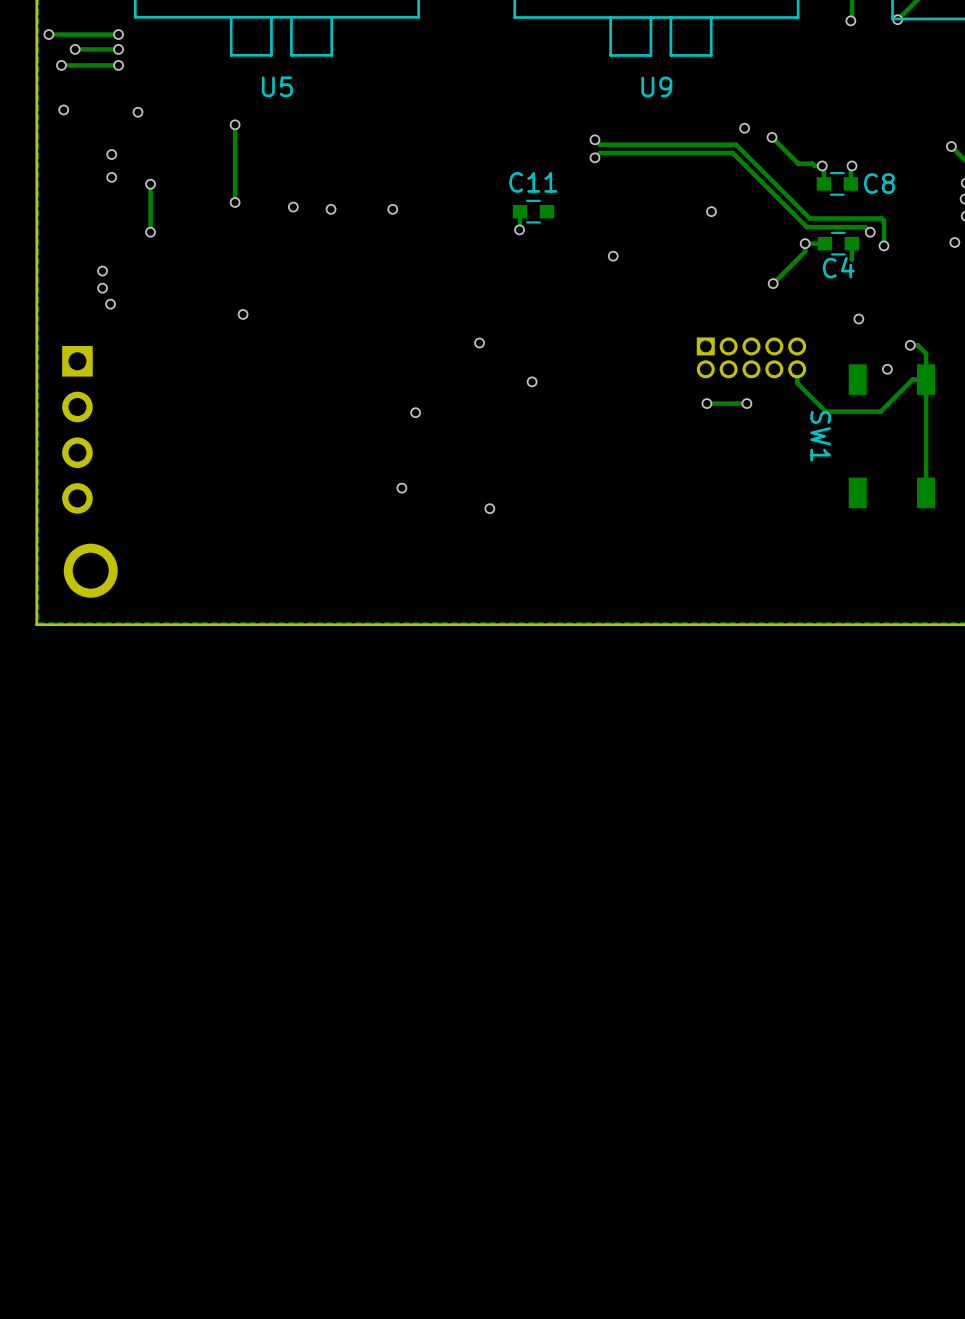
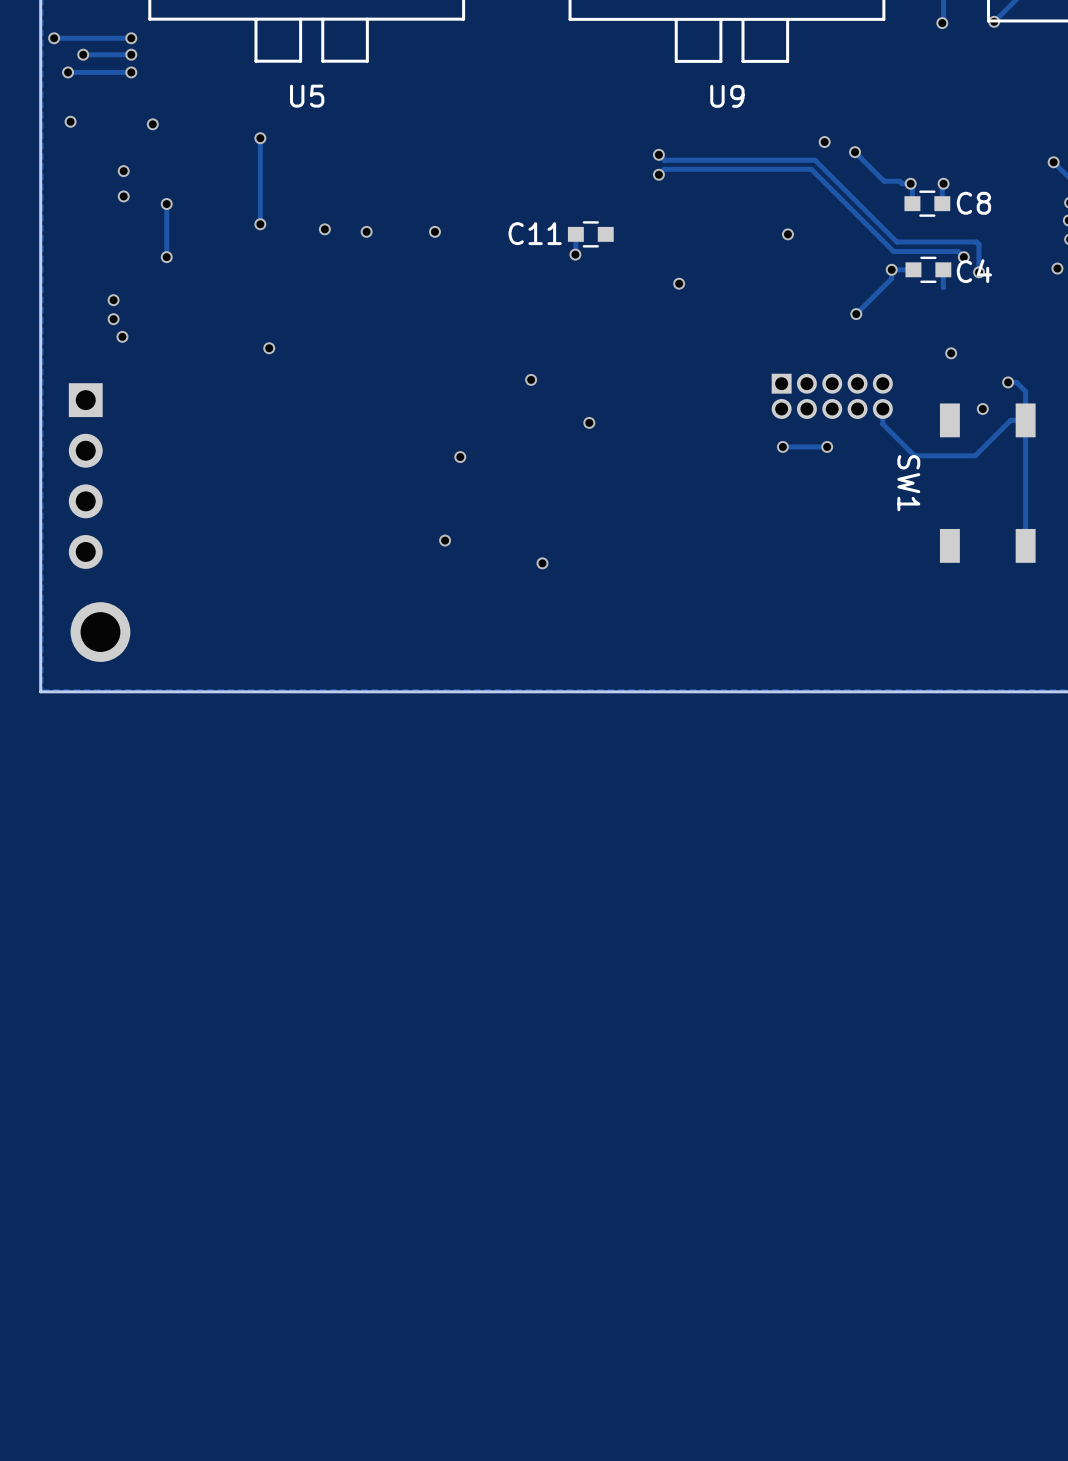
C11 name position: C11 (533, 182) -> C11 (535, 233)
C4 name position: C4 (838, 267) -> C4 (974, 271)

